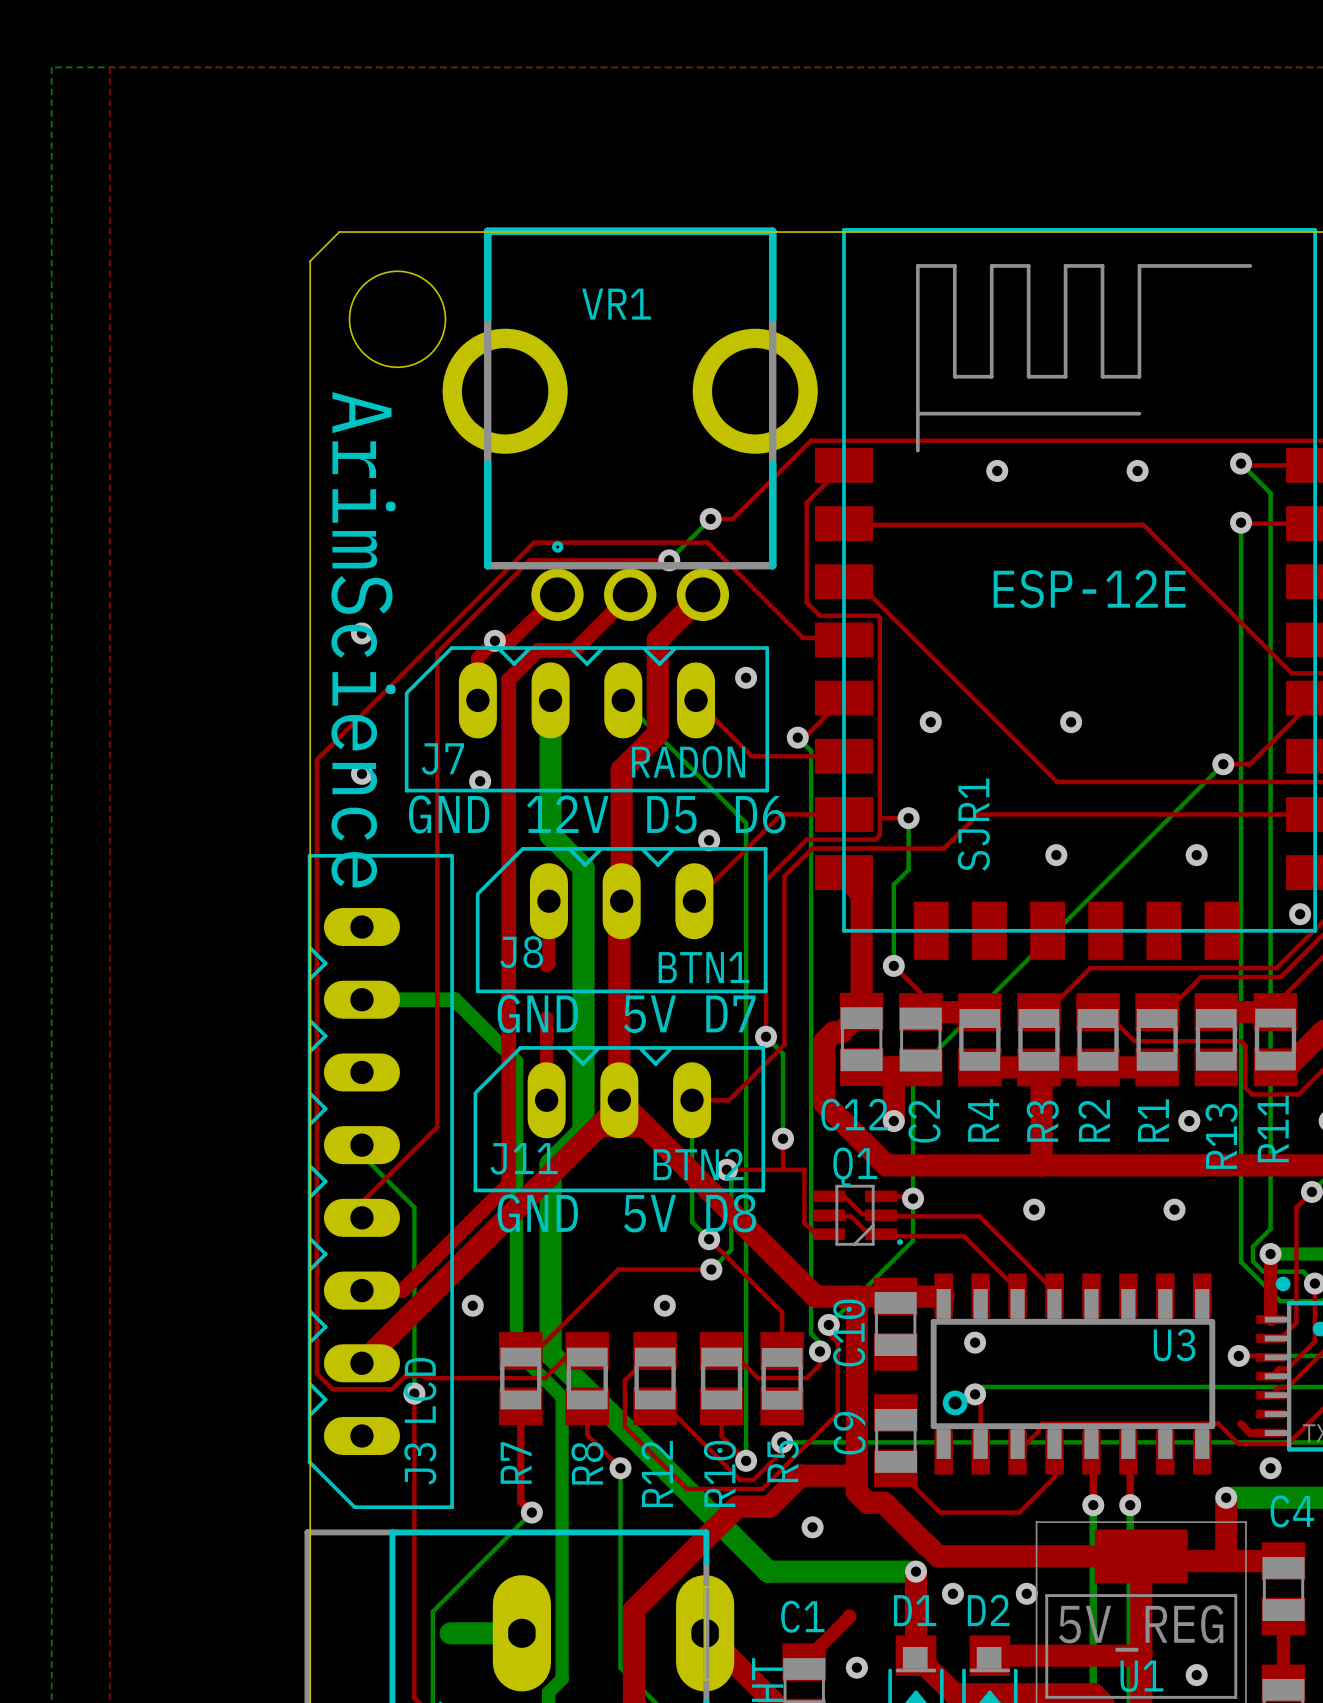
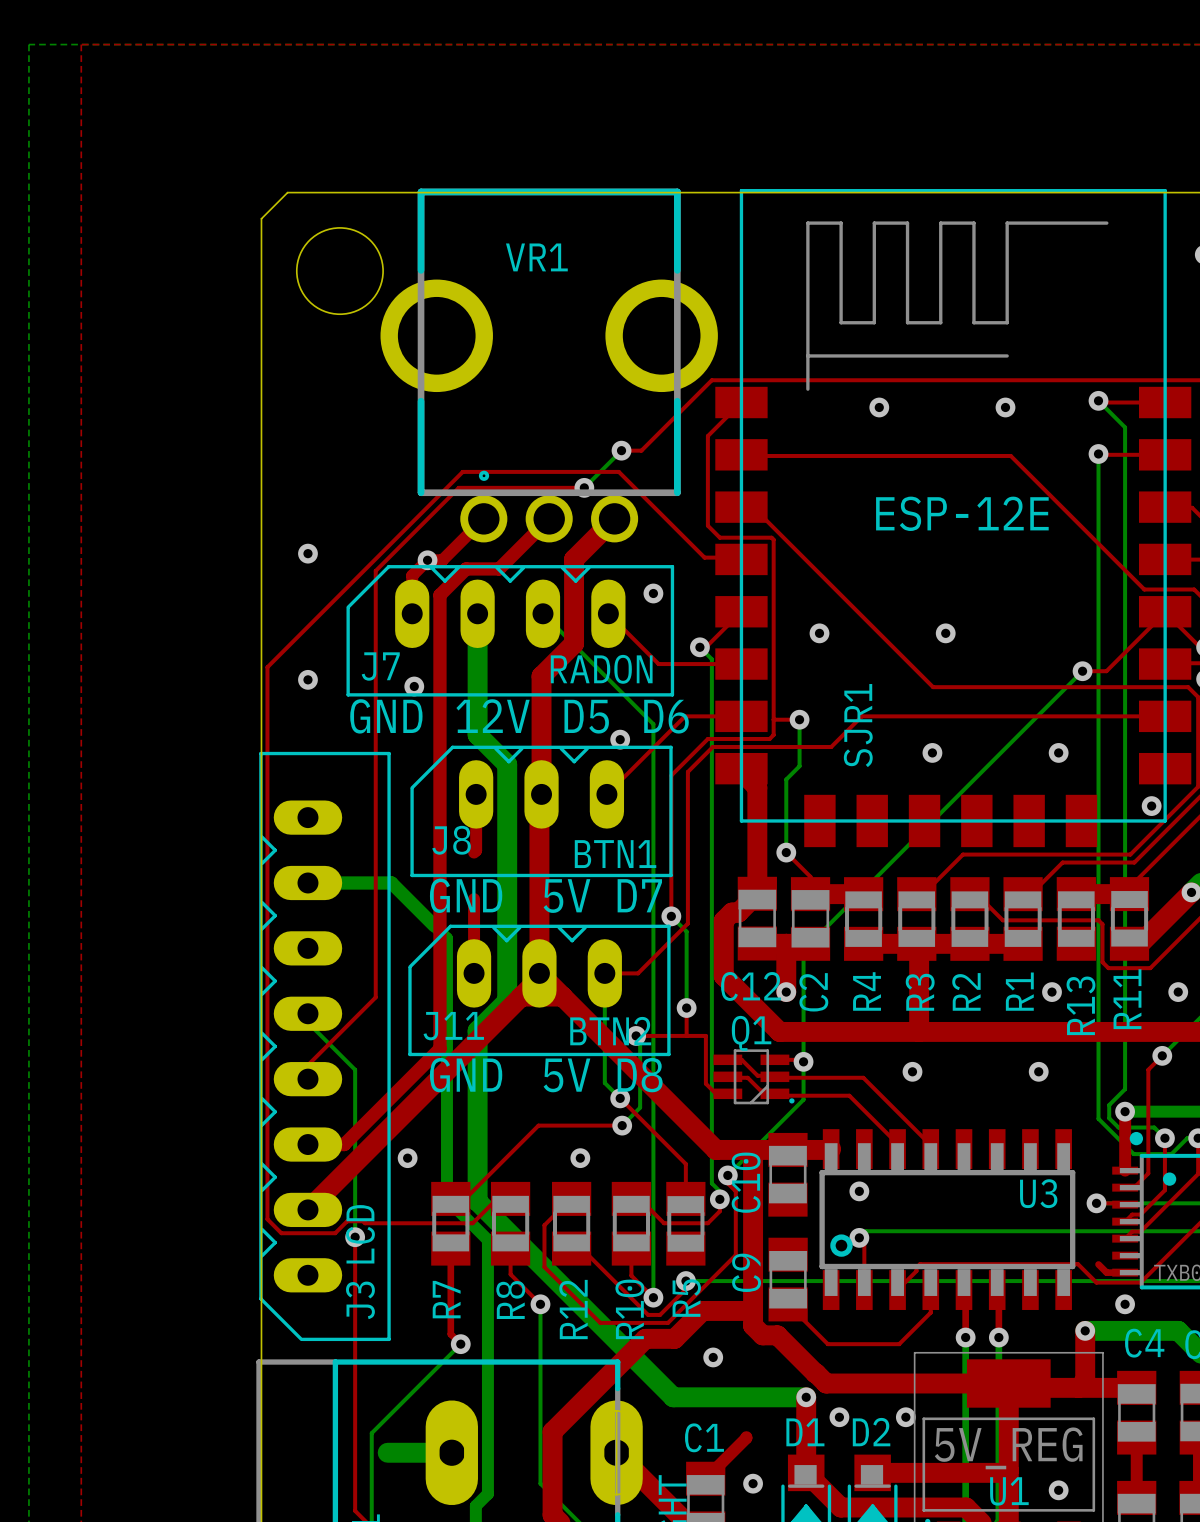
text: ArimScience (363, 639) -> none

